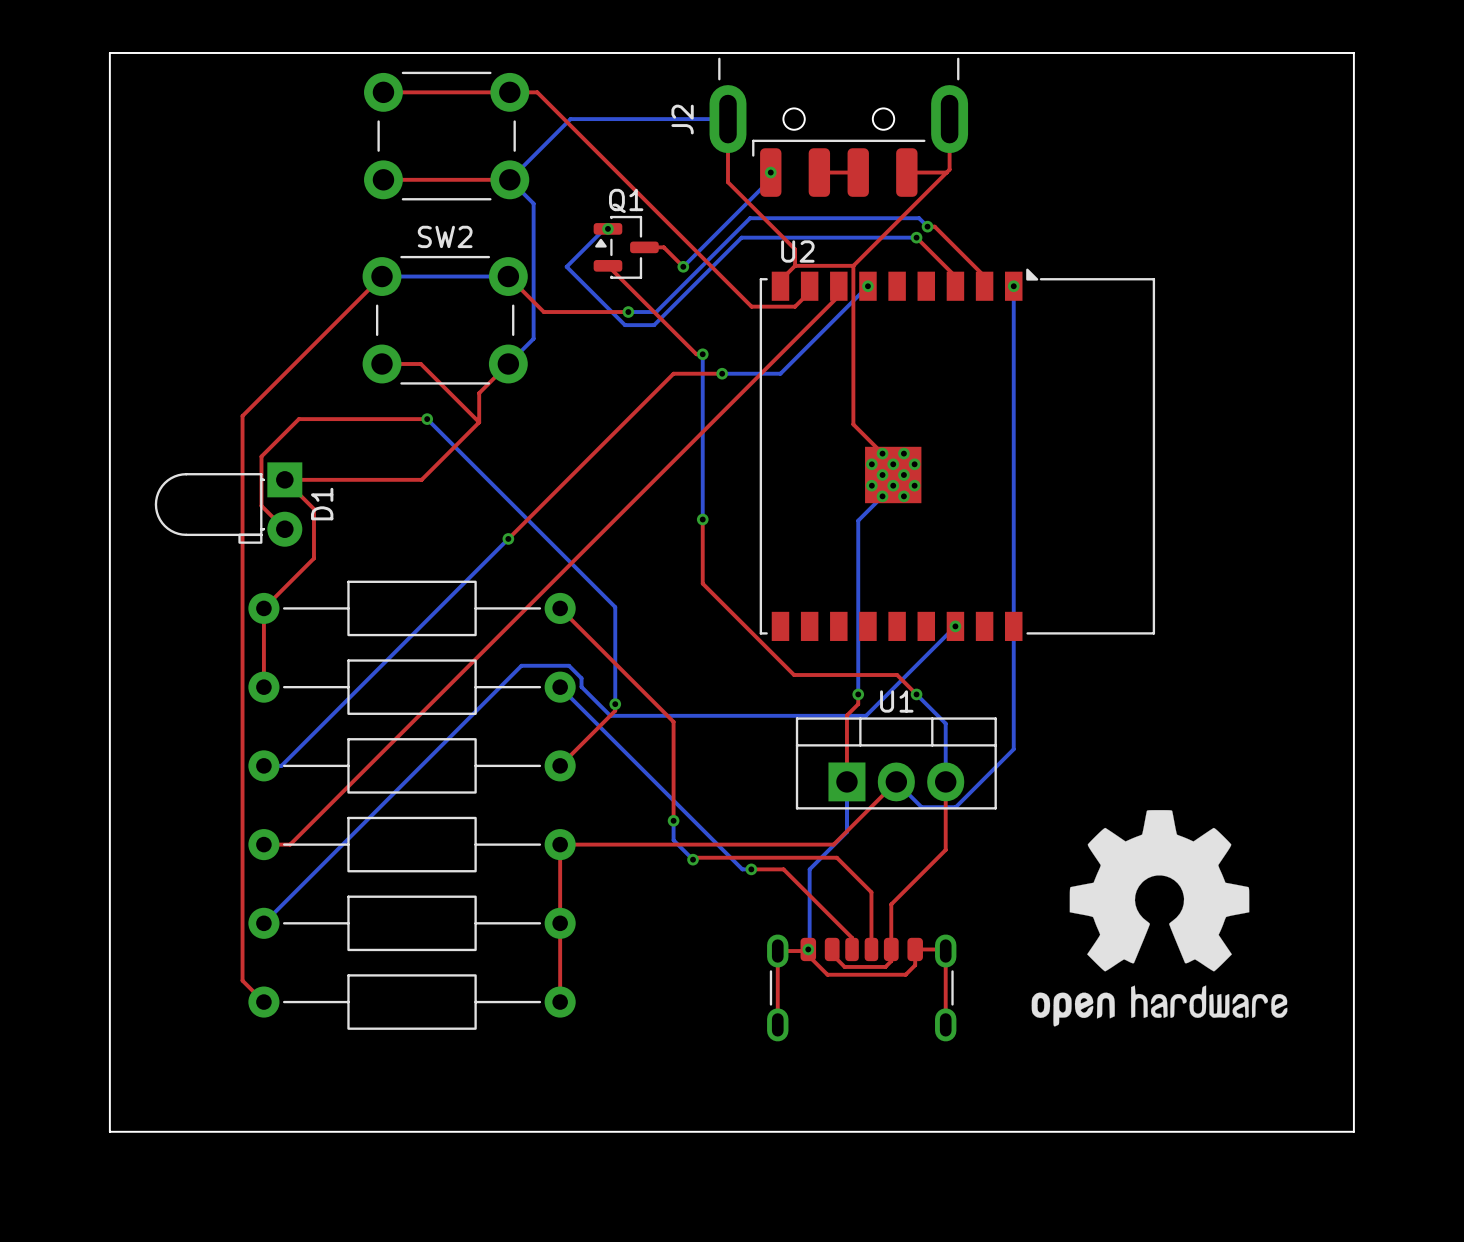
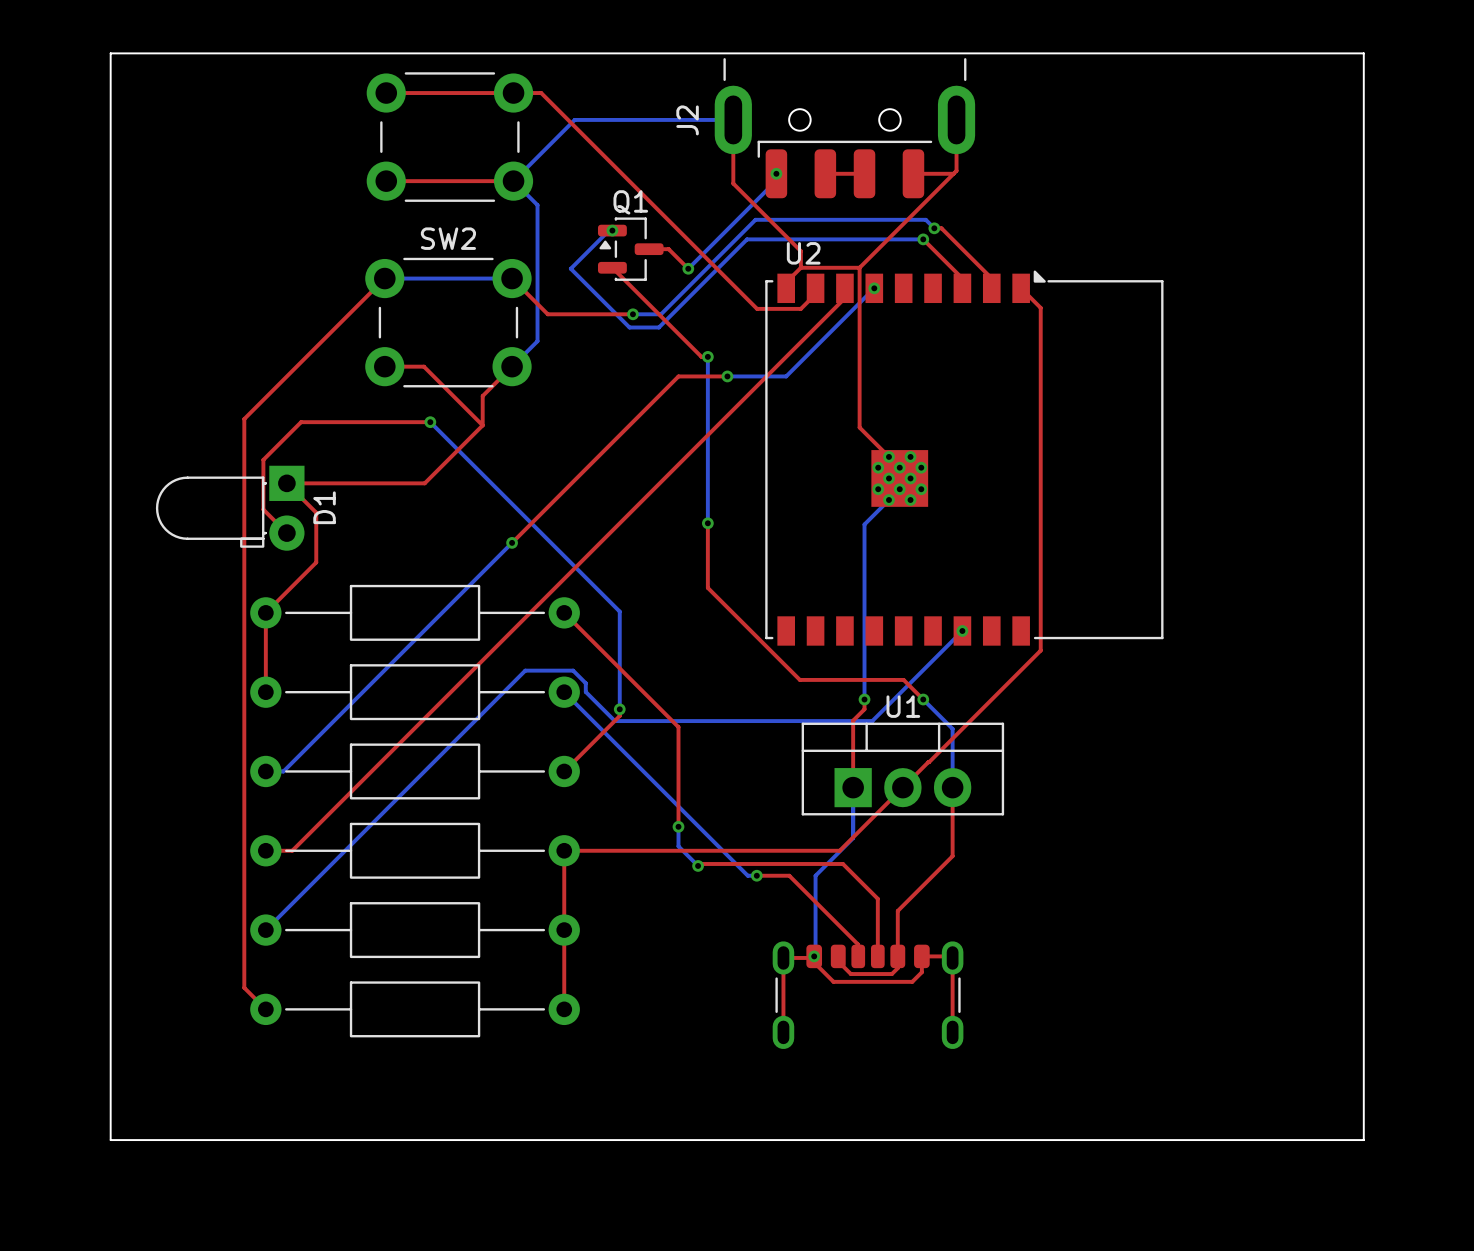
top track: none -> (1021, 288) (1040, 307) (1040, 650) (902, 787)
bottom track: (1013, 286) (1013, 749) (955, 807) (921, 807) (896, 781) -> none
via: (1013, 286) -> none
drawing: [1031, 810, 1288, 1027] -> none

